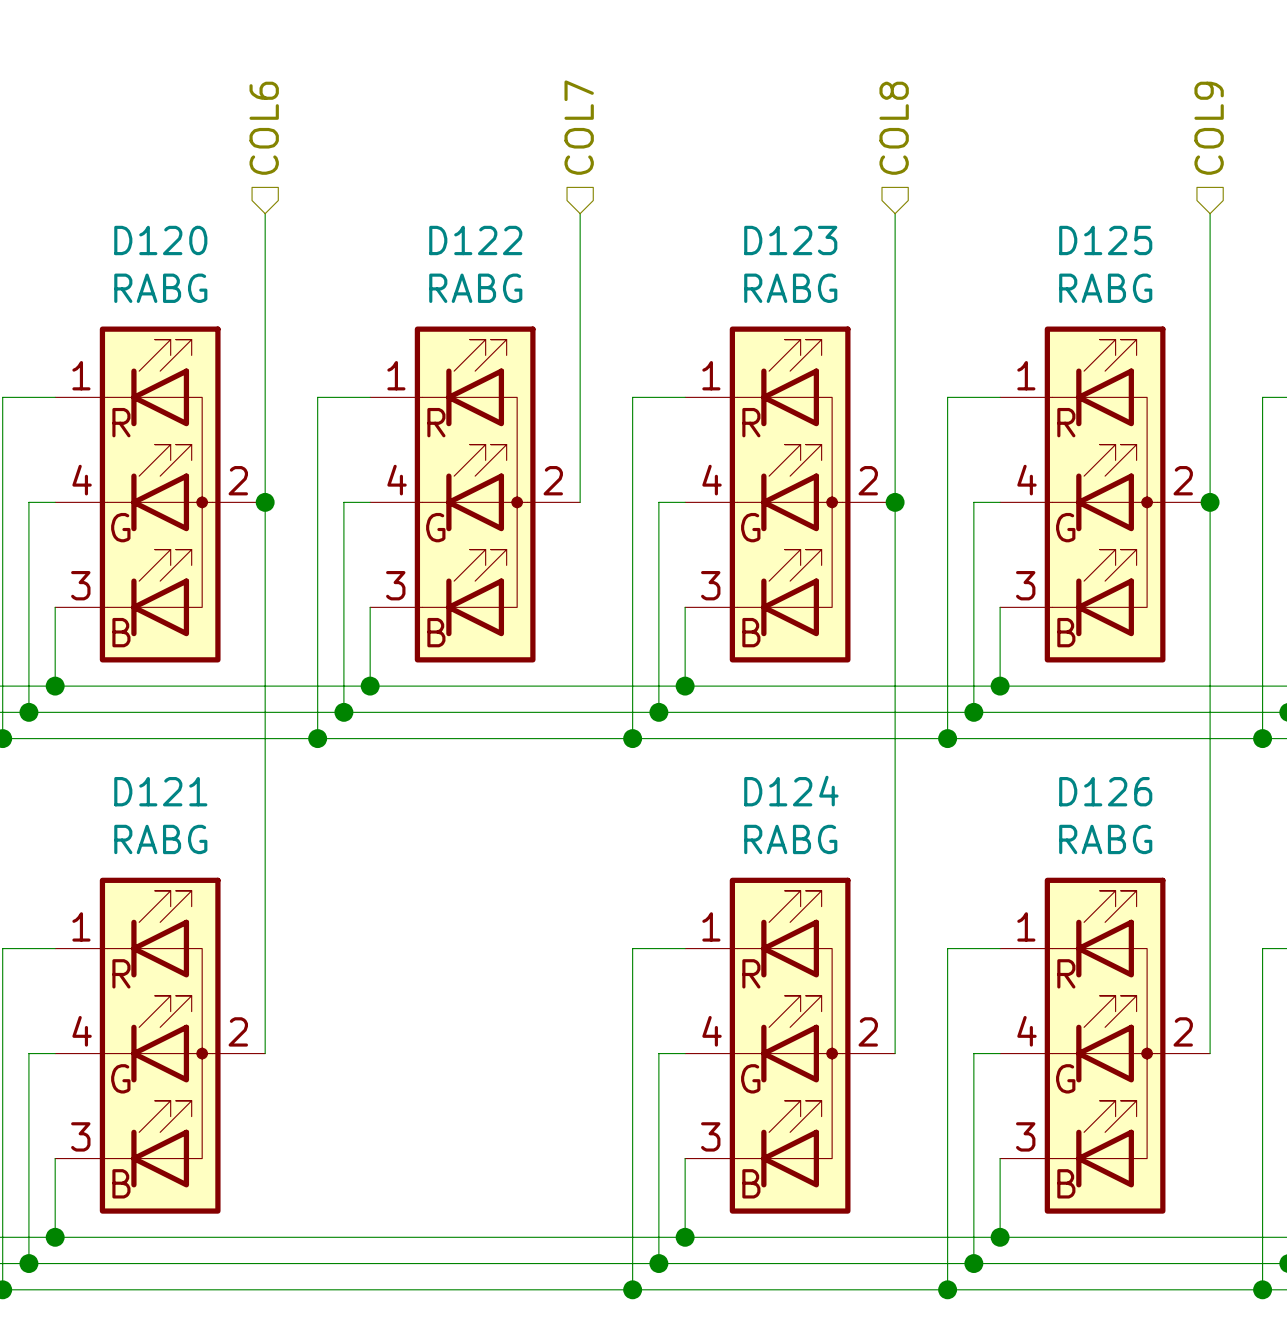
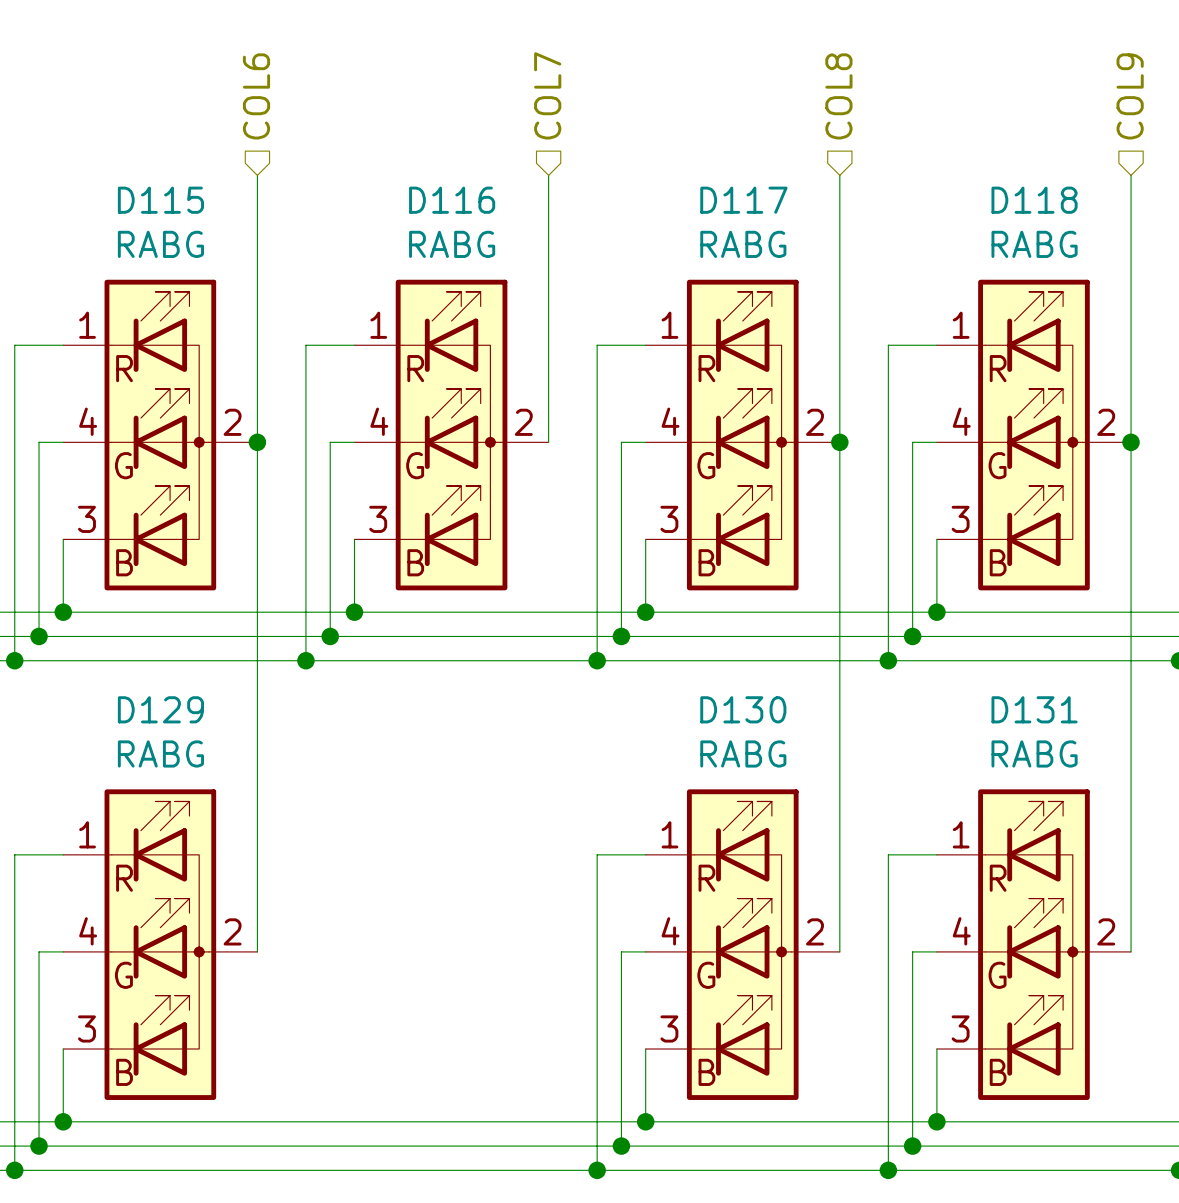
D120 name: D120 (160, 240) -> D115 (160, 200)
D122 name: D122 (475, 240) -> D116 (452, 200)
D123 name: D123 (790, 240) -> D117 (743, 200)
D125 name: D125 (1105, 240) -> D118 (1034, 200)
D121 name: D121 (160, 791) -> D129 (160, 709)
D124 name: D124 (791, 791) -> D130 (743, 709)
D126 name: D126 (1105, 791) -> D131 (1034, 709)

